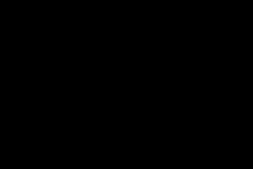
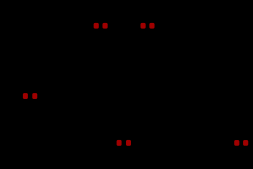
part: none -> (100, 25)
part: none -> (147, 25)
part: none -> (30, 96)
part: none -> (123, 142)
part: none -> (241, 142)

